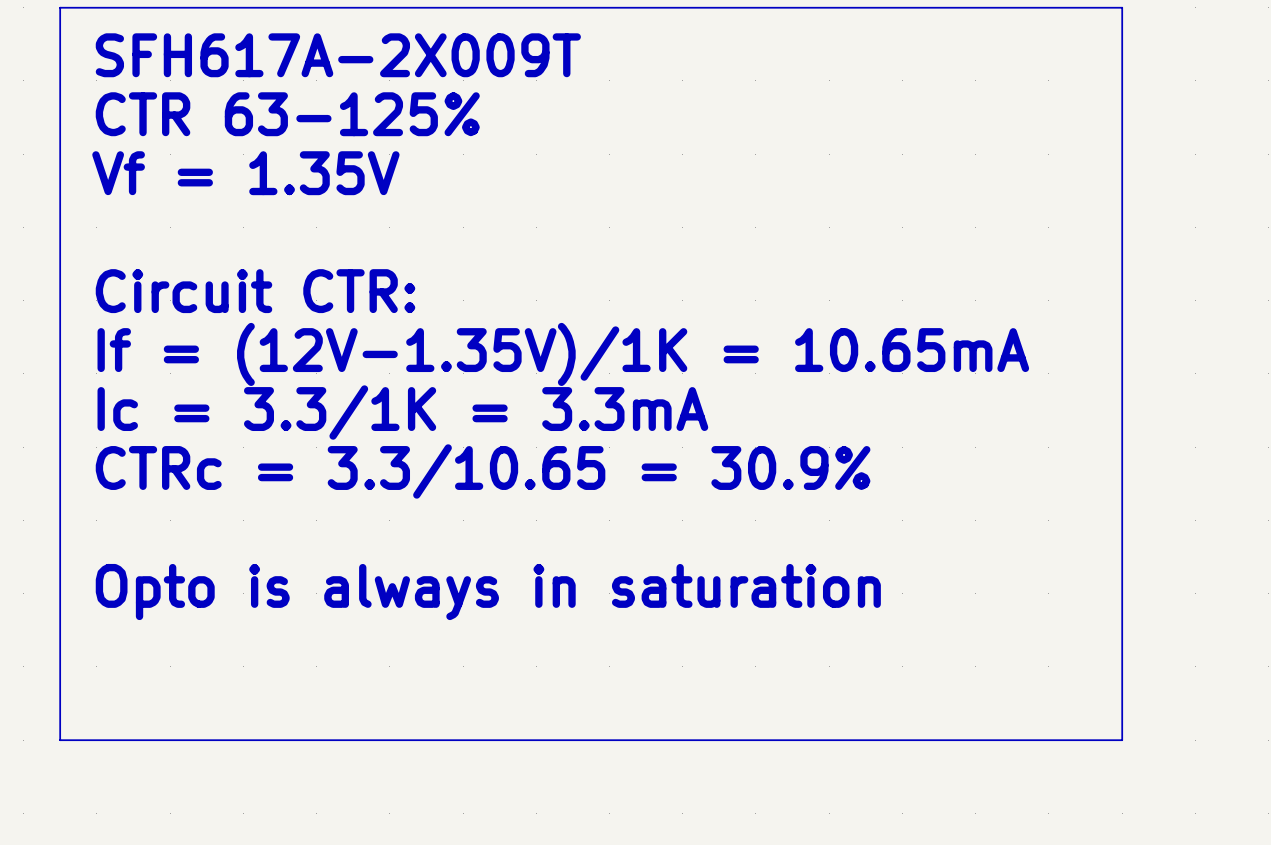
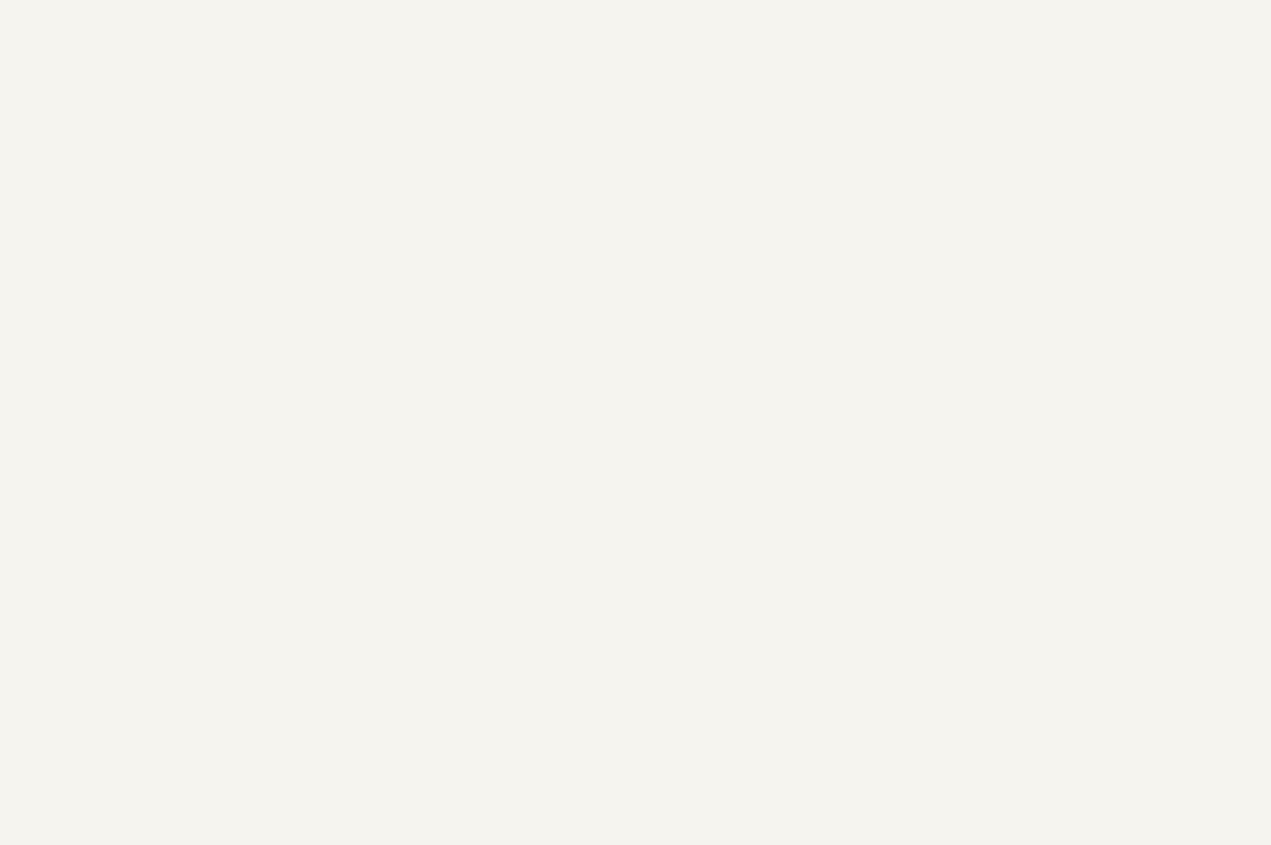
line: (60, 7) (1122, 7) (1122, 740) (60, 740) (60, 7) -> none
text: SFH617A-2X009T (338, 55) -> none
text: CTR 63-125% (287, 114) -> none
text: Vf = 1.35V (245, 173) -> none
text: Circuit CTR: (255, 291) -> none
text: If = (12V-1.35V)/1K = 10.65mA (563, 354) -> none
text: Ic = 3.3/1K = 3.3mA (402, 412) -> none
text: CTRc = 3.3/10.65 = 30.9% (483, 471) -> none
text: Opto is always in saturation (488, 592) -> none

